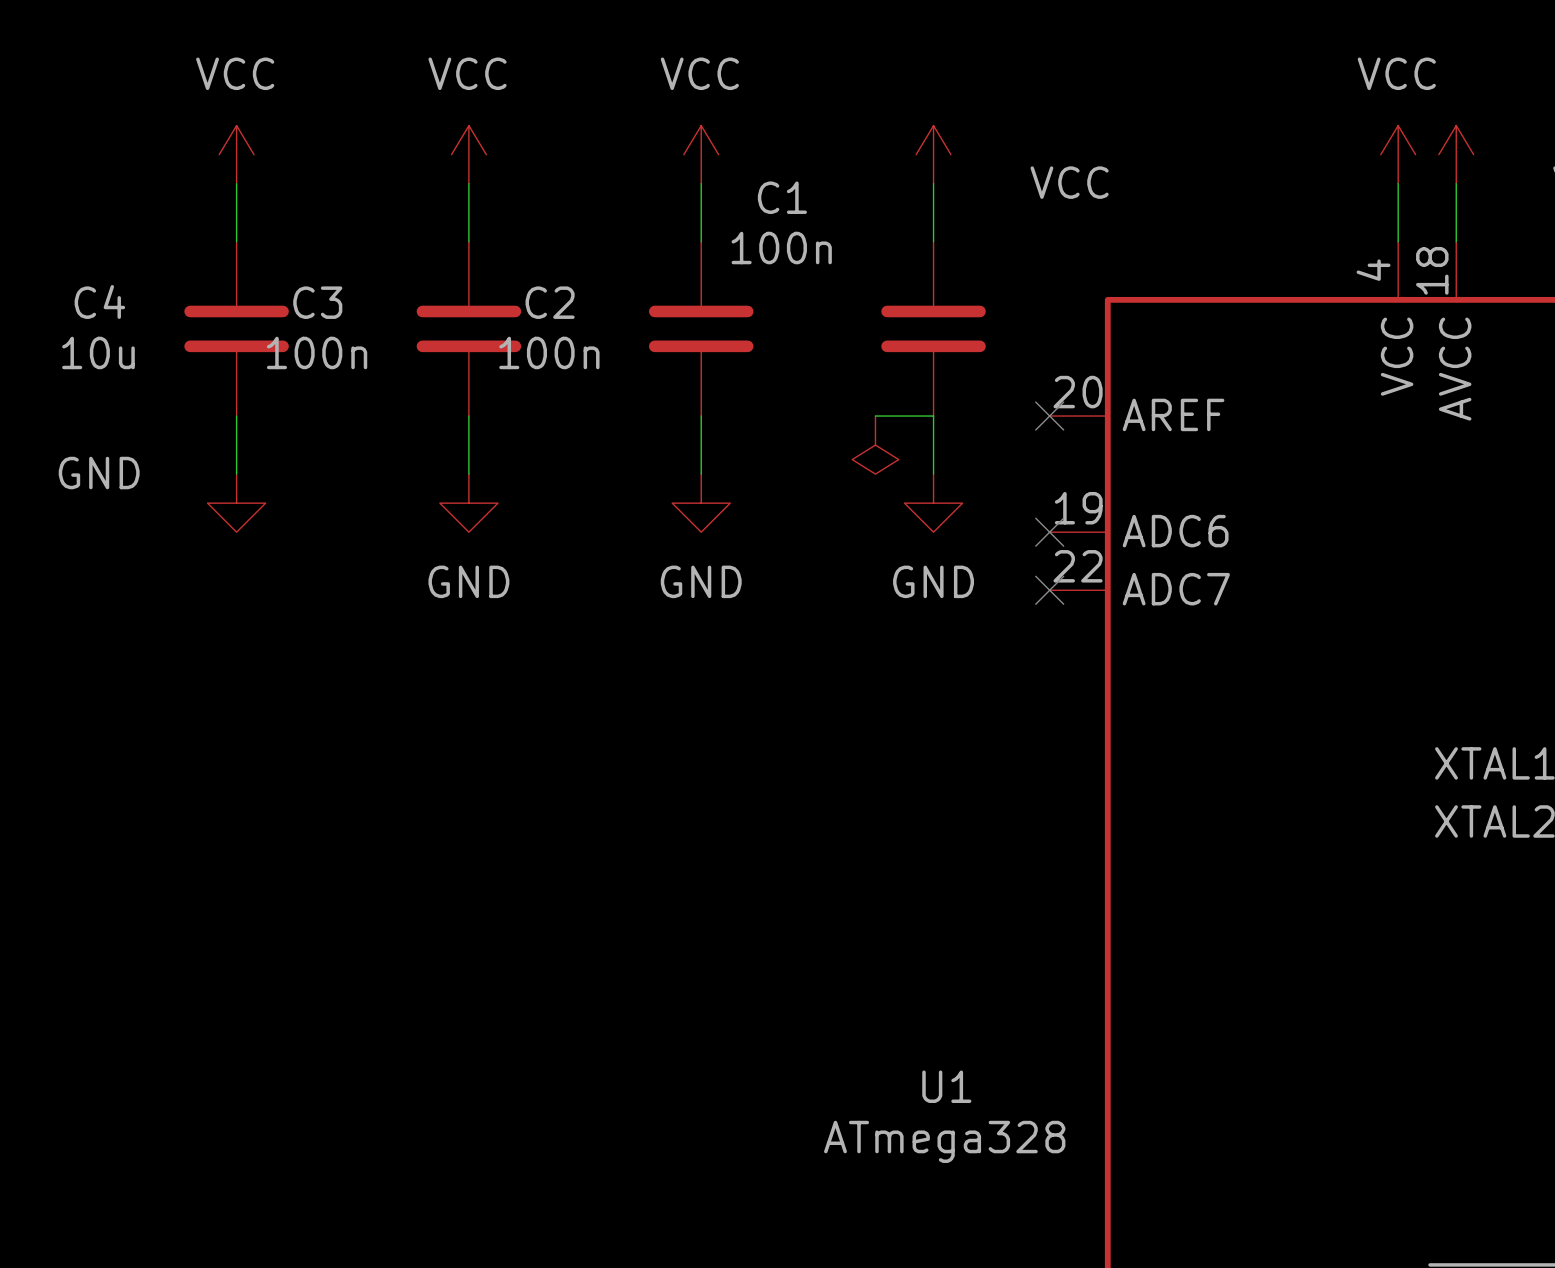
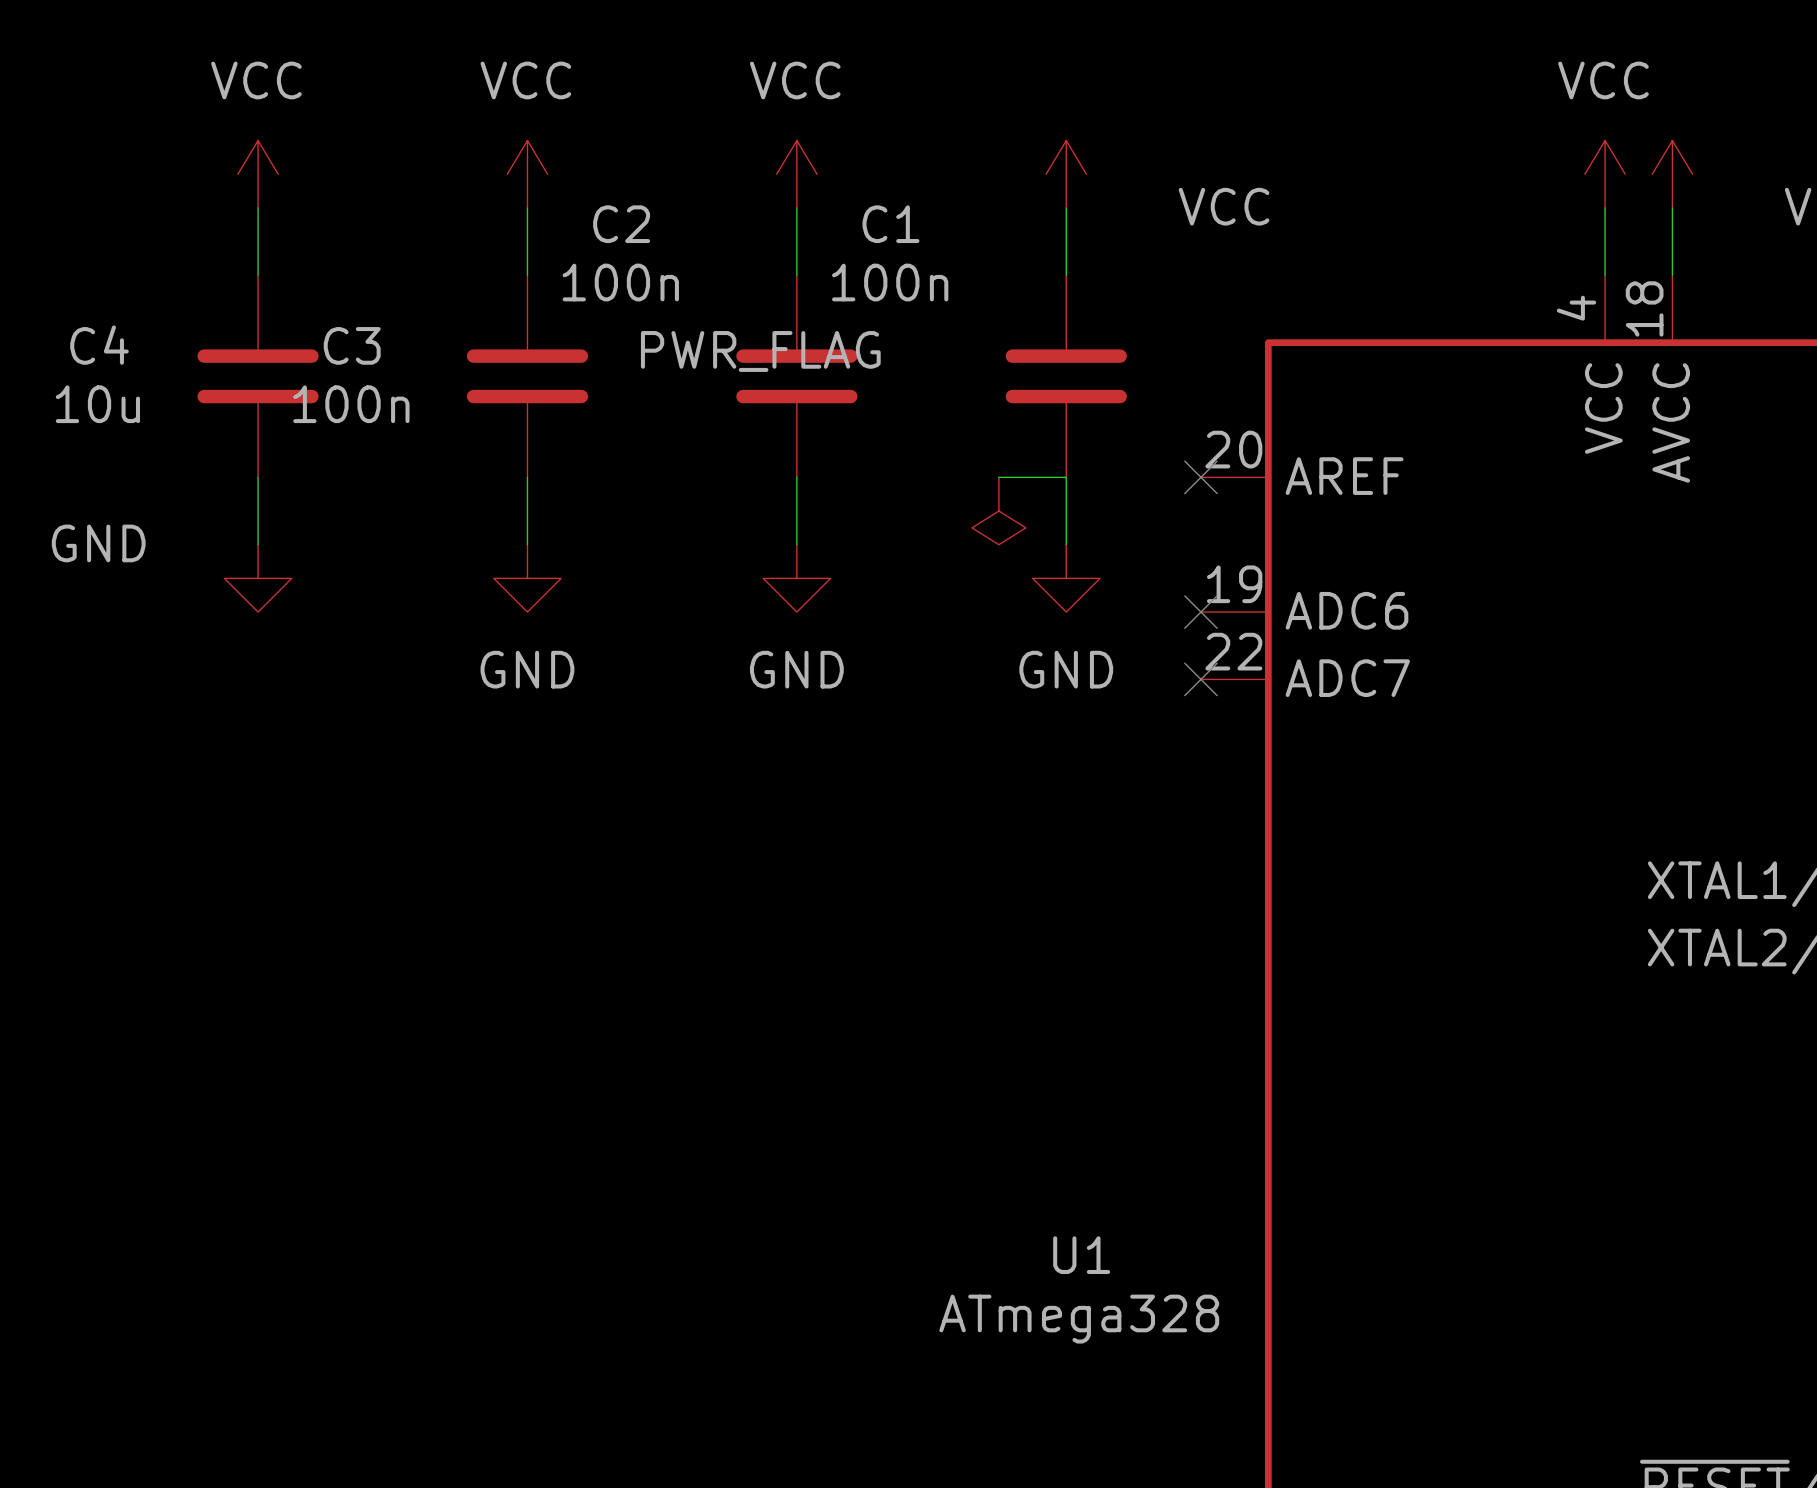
C2 name position: C2 (550, 302) -> C2 (621, 224)
power symbol text: none -> PWR_FLAG (760, 351)
C2 value position: 100n (549, 352) -> 100n (620, 282)

